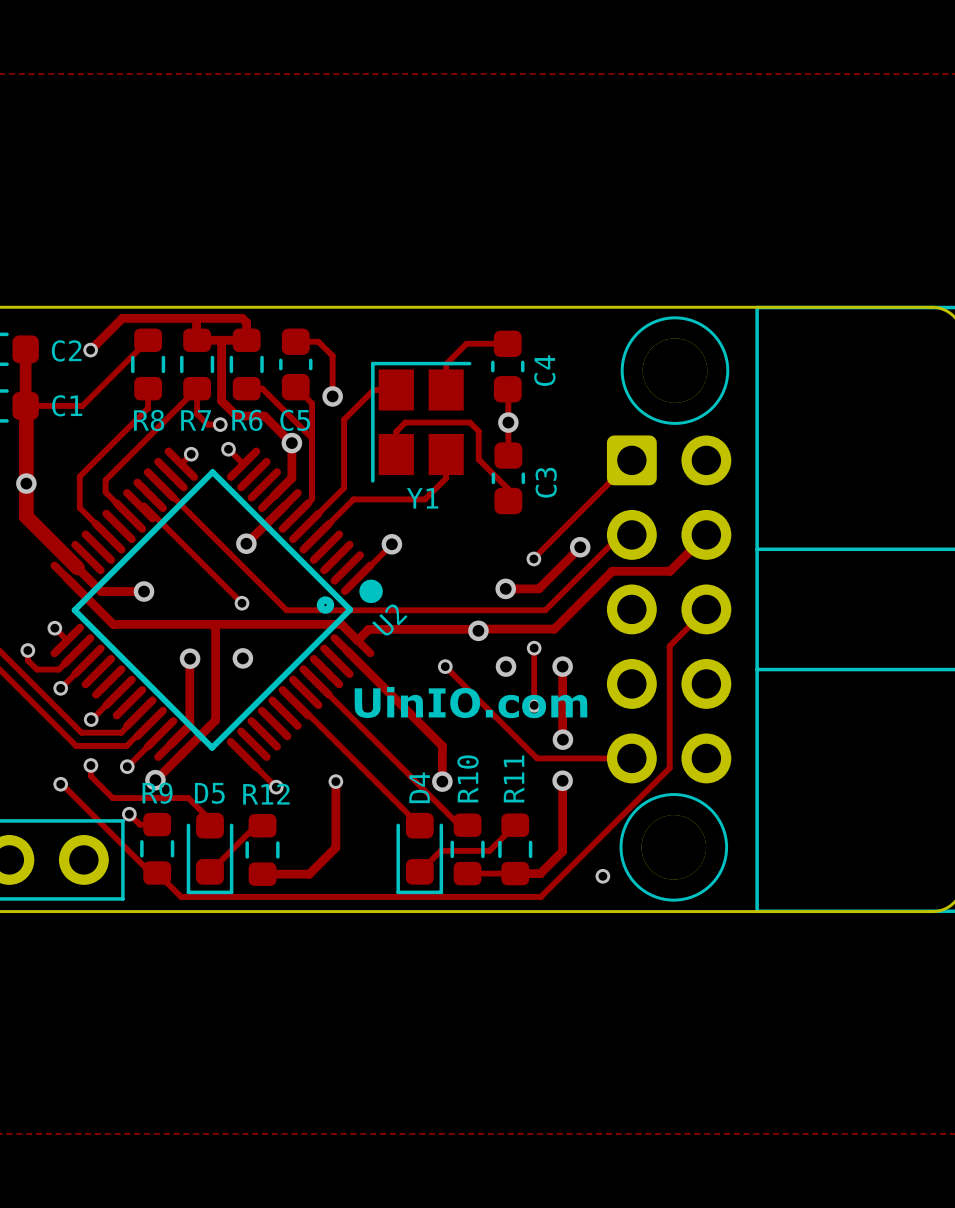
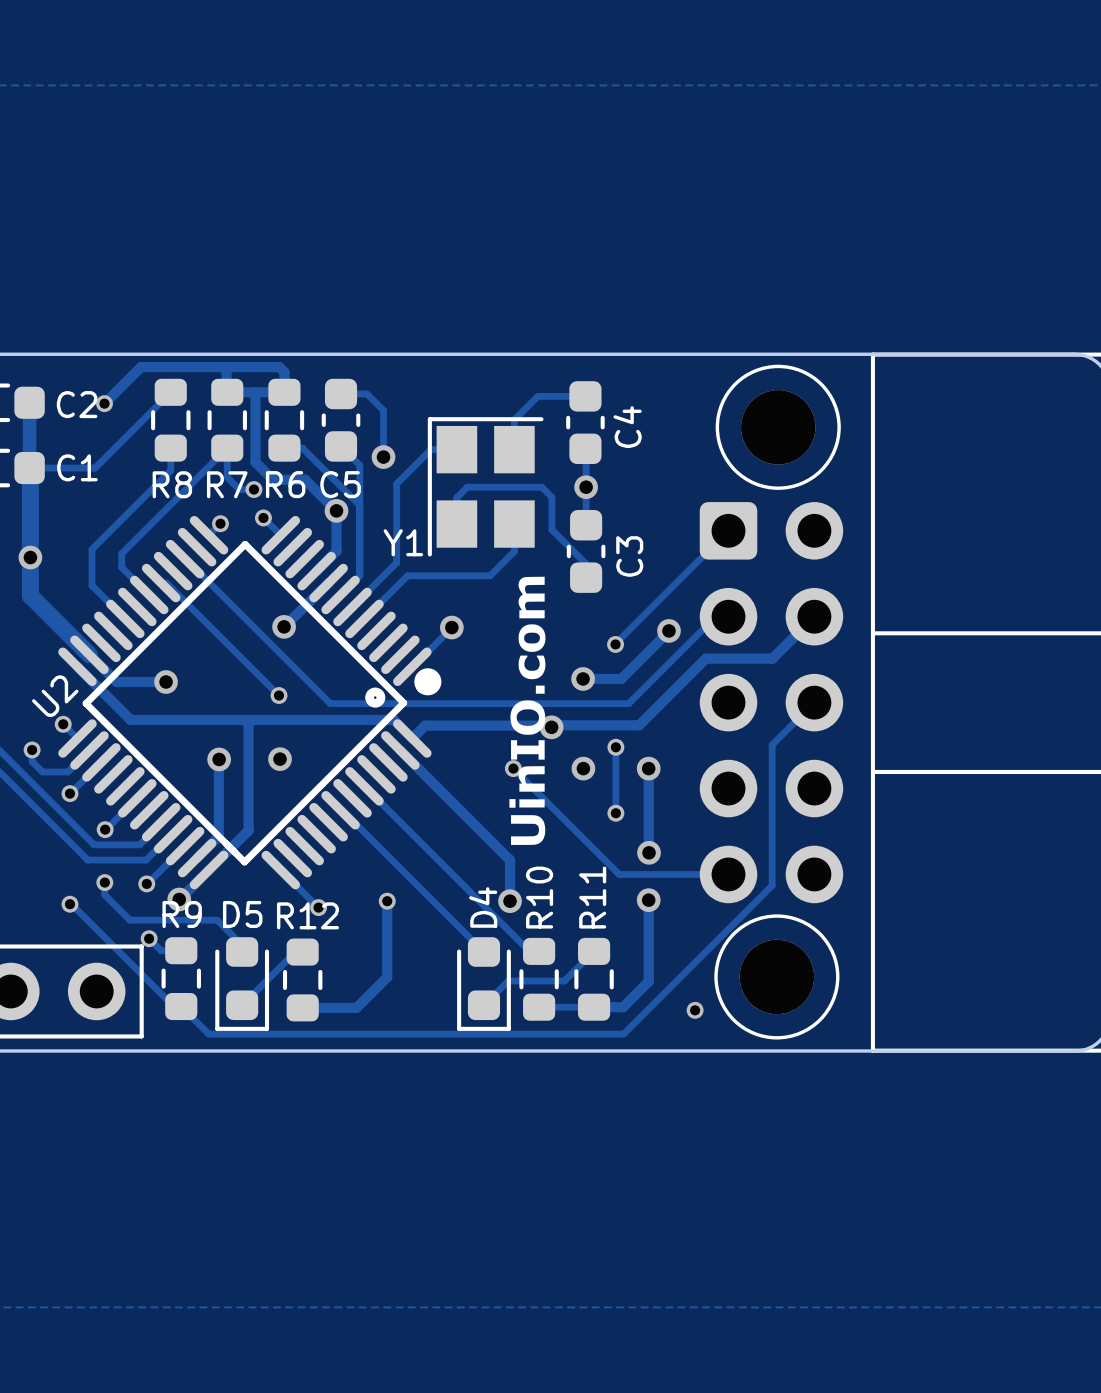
Y1 name position: Y1 (422, 498) -> Y1 (403, 542)
drawing: none -> [509, 576, 546, 845]
U2 name position: U2 (389, 619) -> U2 (55, 696)
drawing: [354, 686, 588, 719] -> none

